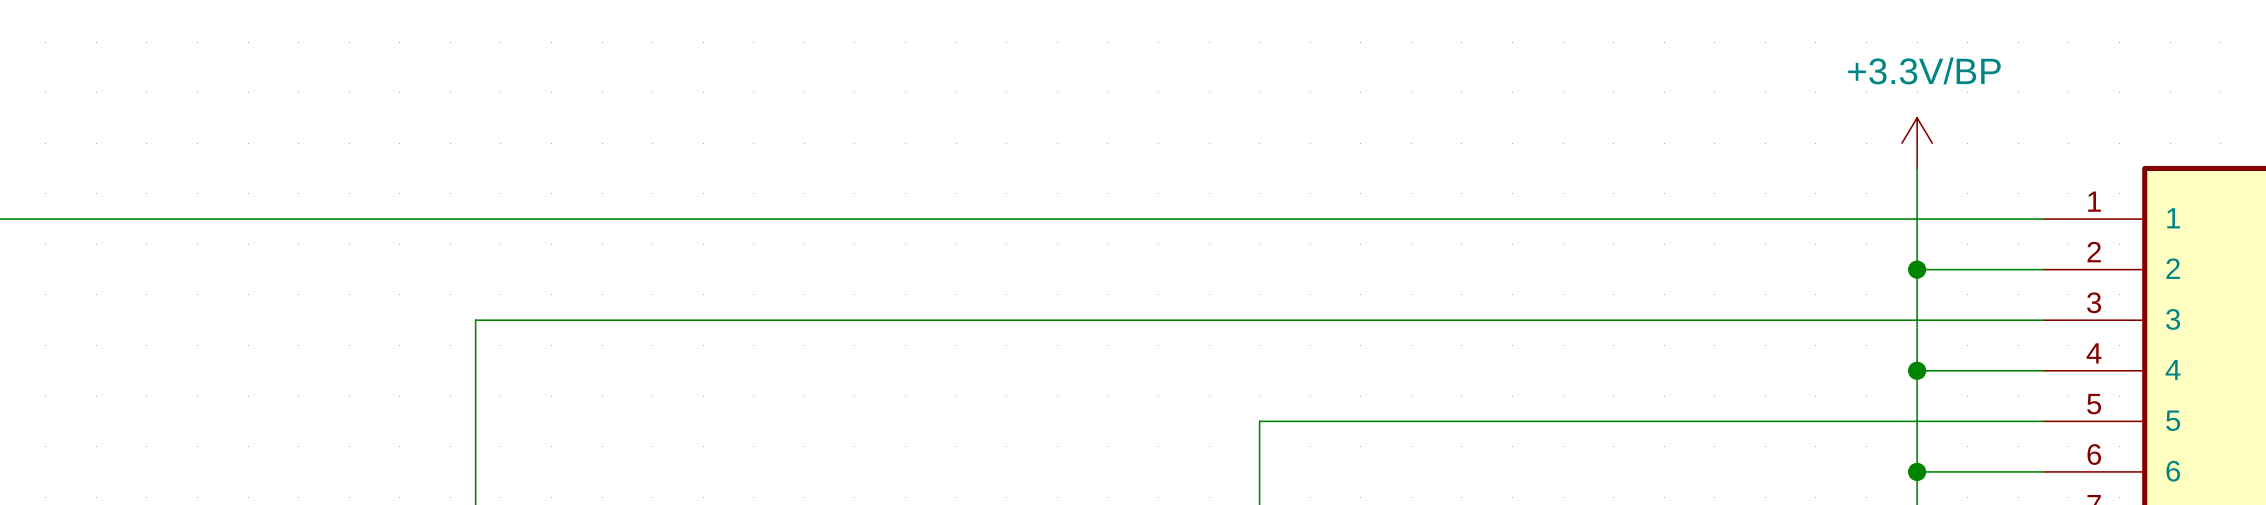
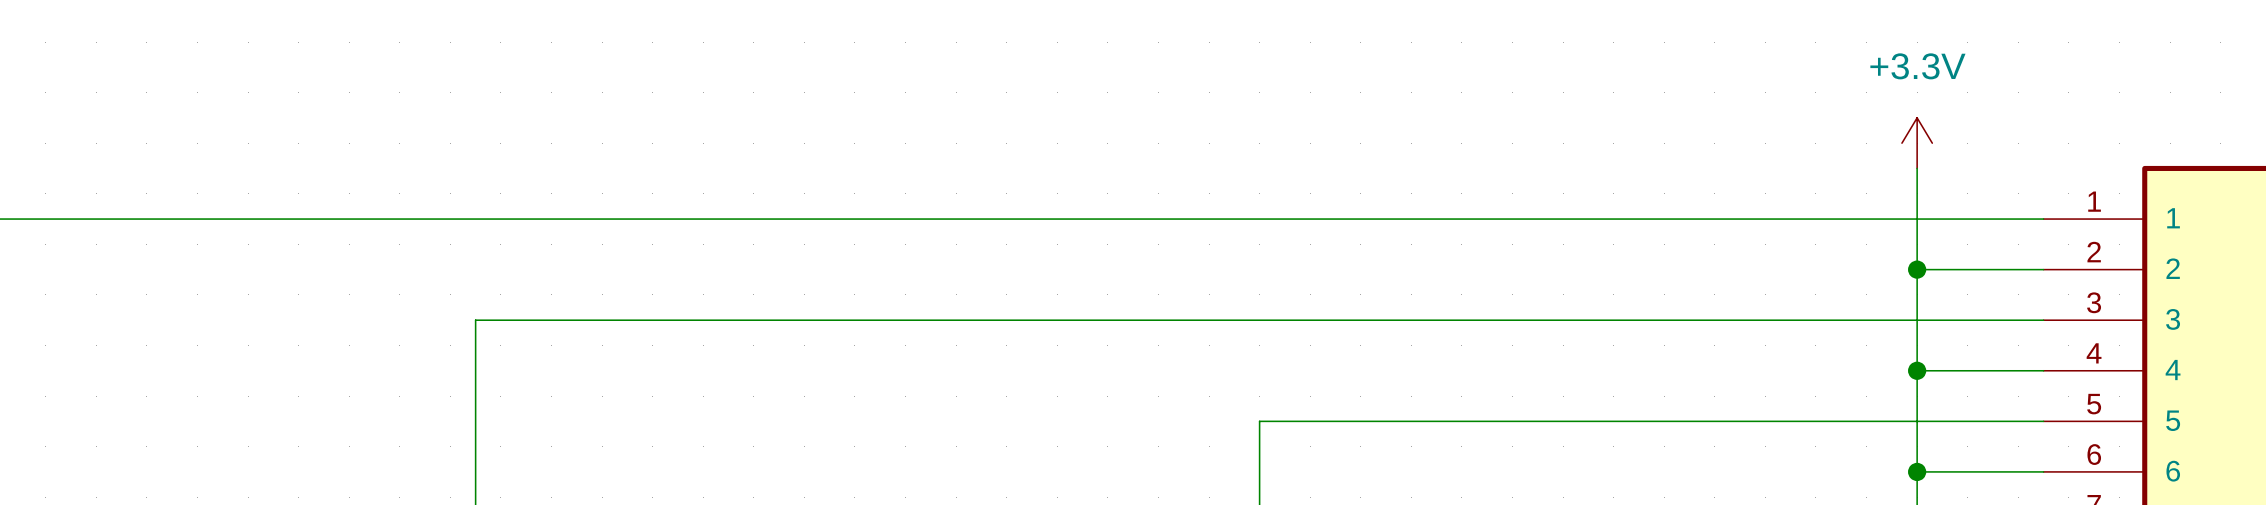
power symbol: +3.3V/BP (1917, 143) -> +3.3V (1917, 143)

